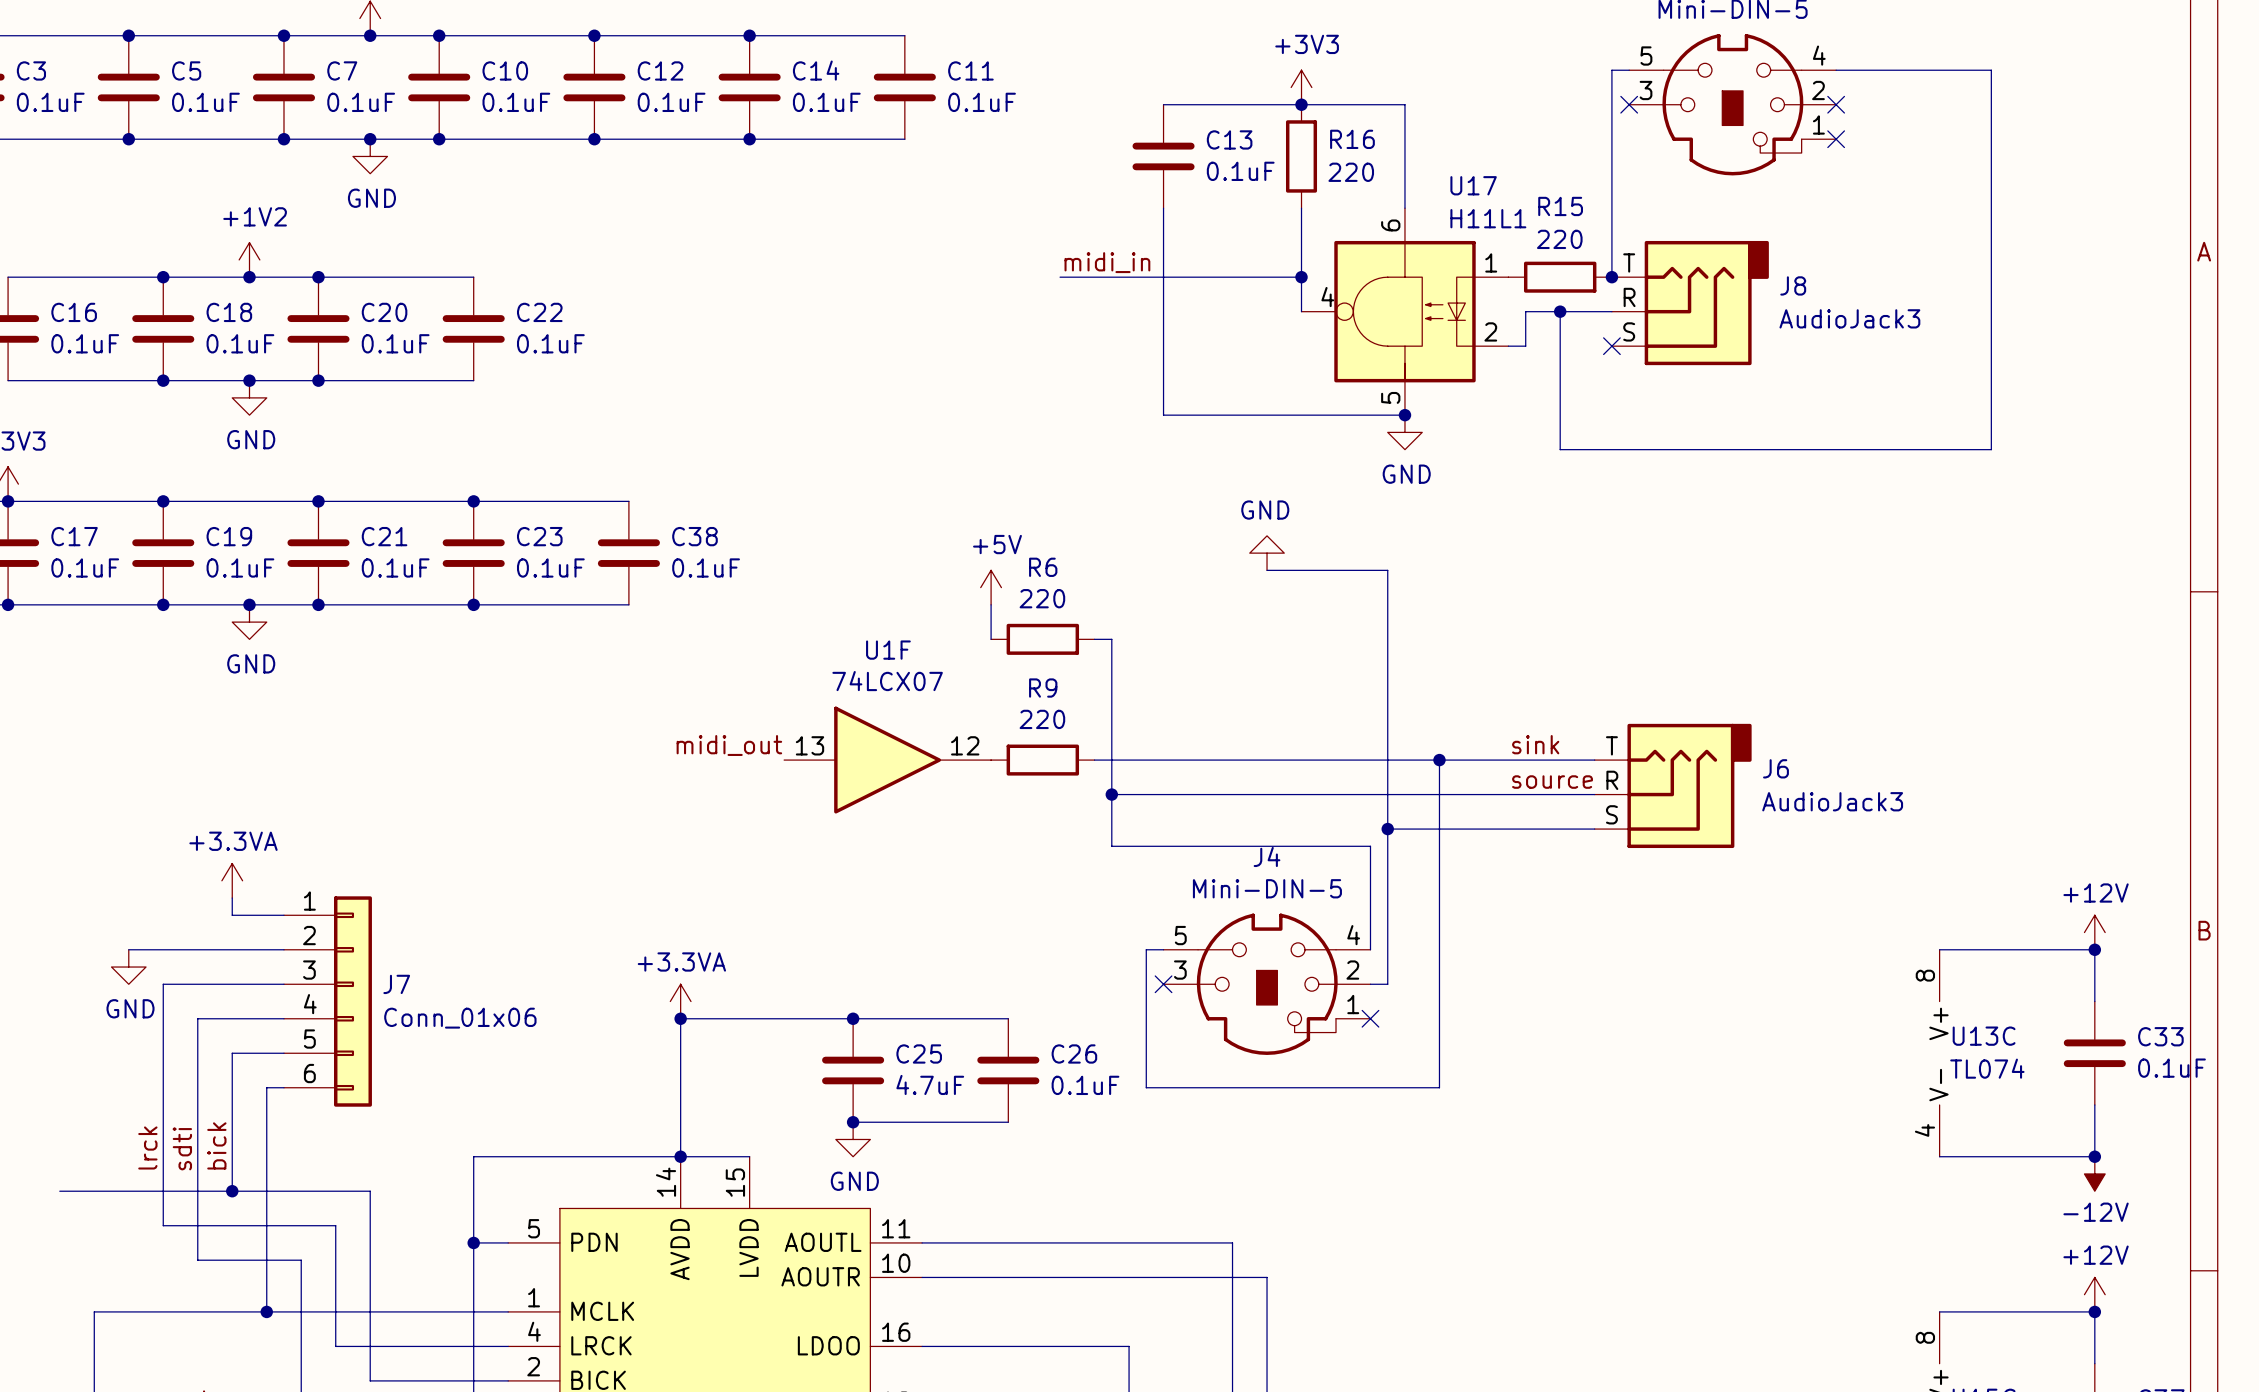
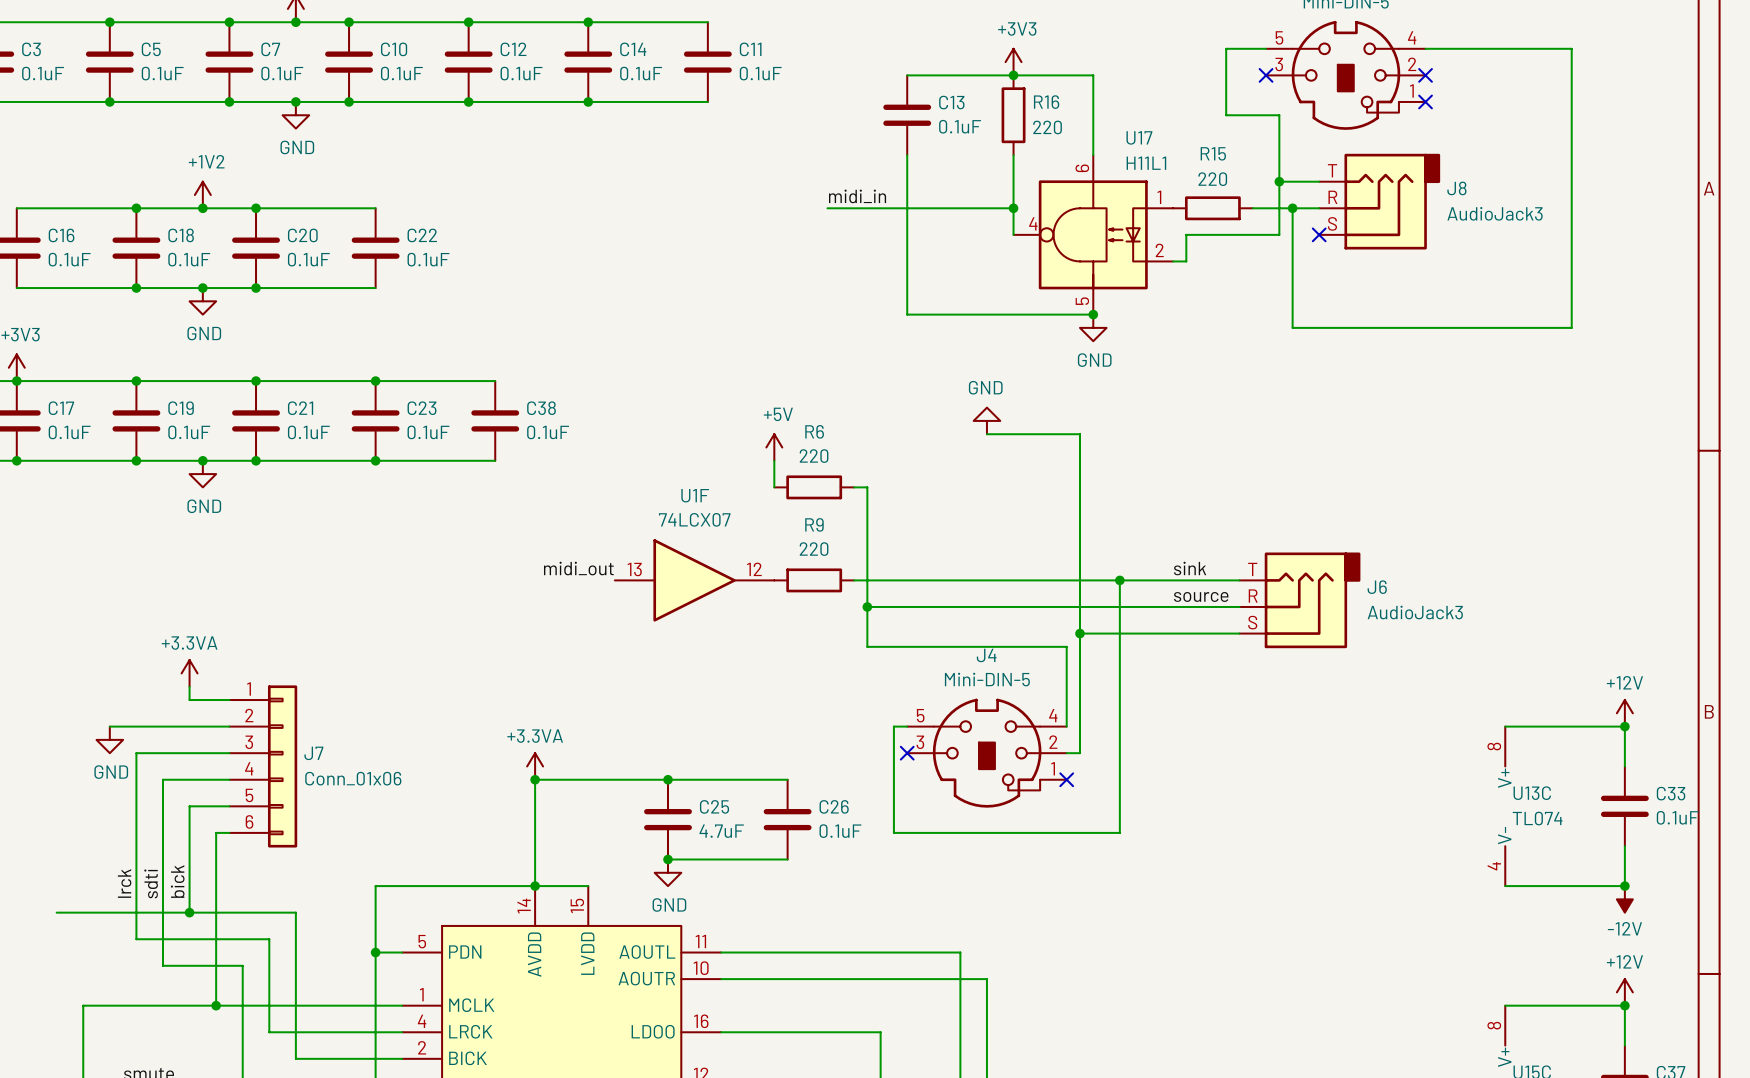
wire: (1611, 70) (1611, 277) -> (1252, 48) (1226, 48) (1226, 115) (1279, 115) (1279, 234) (1252, 234)
wire: (1991, 70) (1991, 449) (1560, 449) (1560, 311) -> (1545, 48) (1571, 48) (1571, 327) (1292, 327) (1292, 208)
junction: none -> (1279, 181)
junction: (1611, 277) -> none
junction: none -> (1292, 208)
J8 position: (1690, 303) -> (1379, 201)
junction: (1560, 311) -> none
no-connect mark: none -> (1319, 234)
no-connect mark: (1611, 346) -> none

